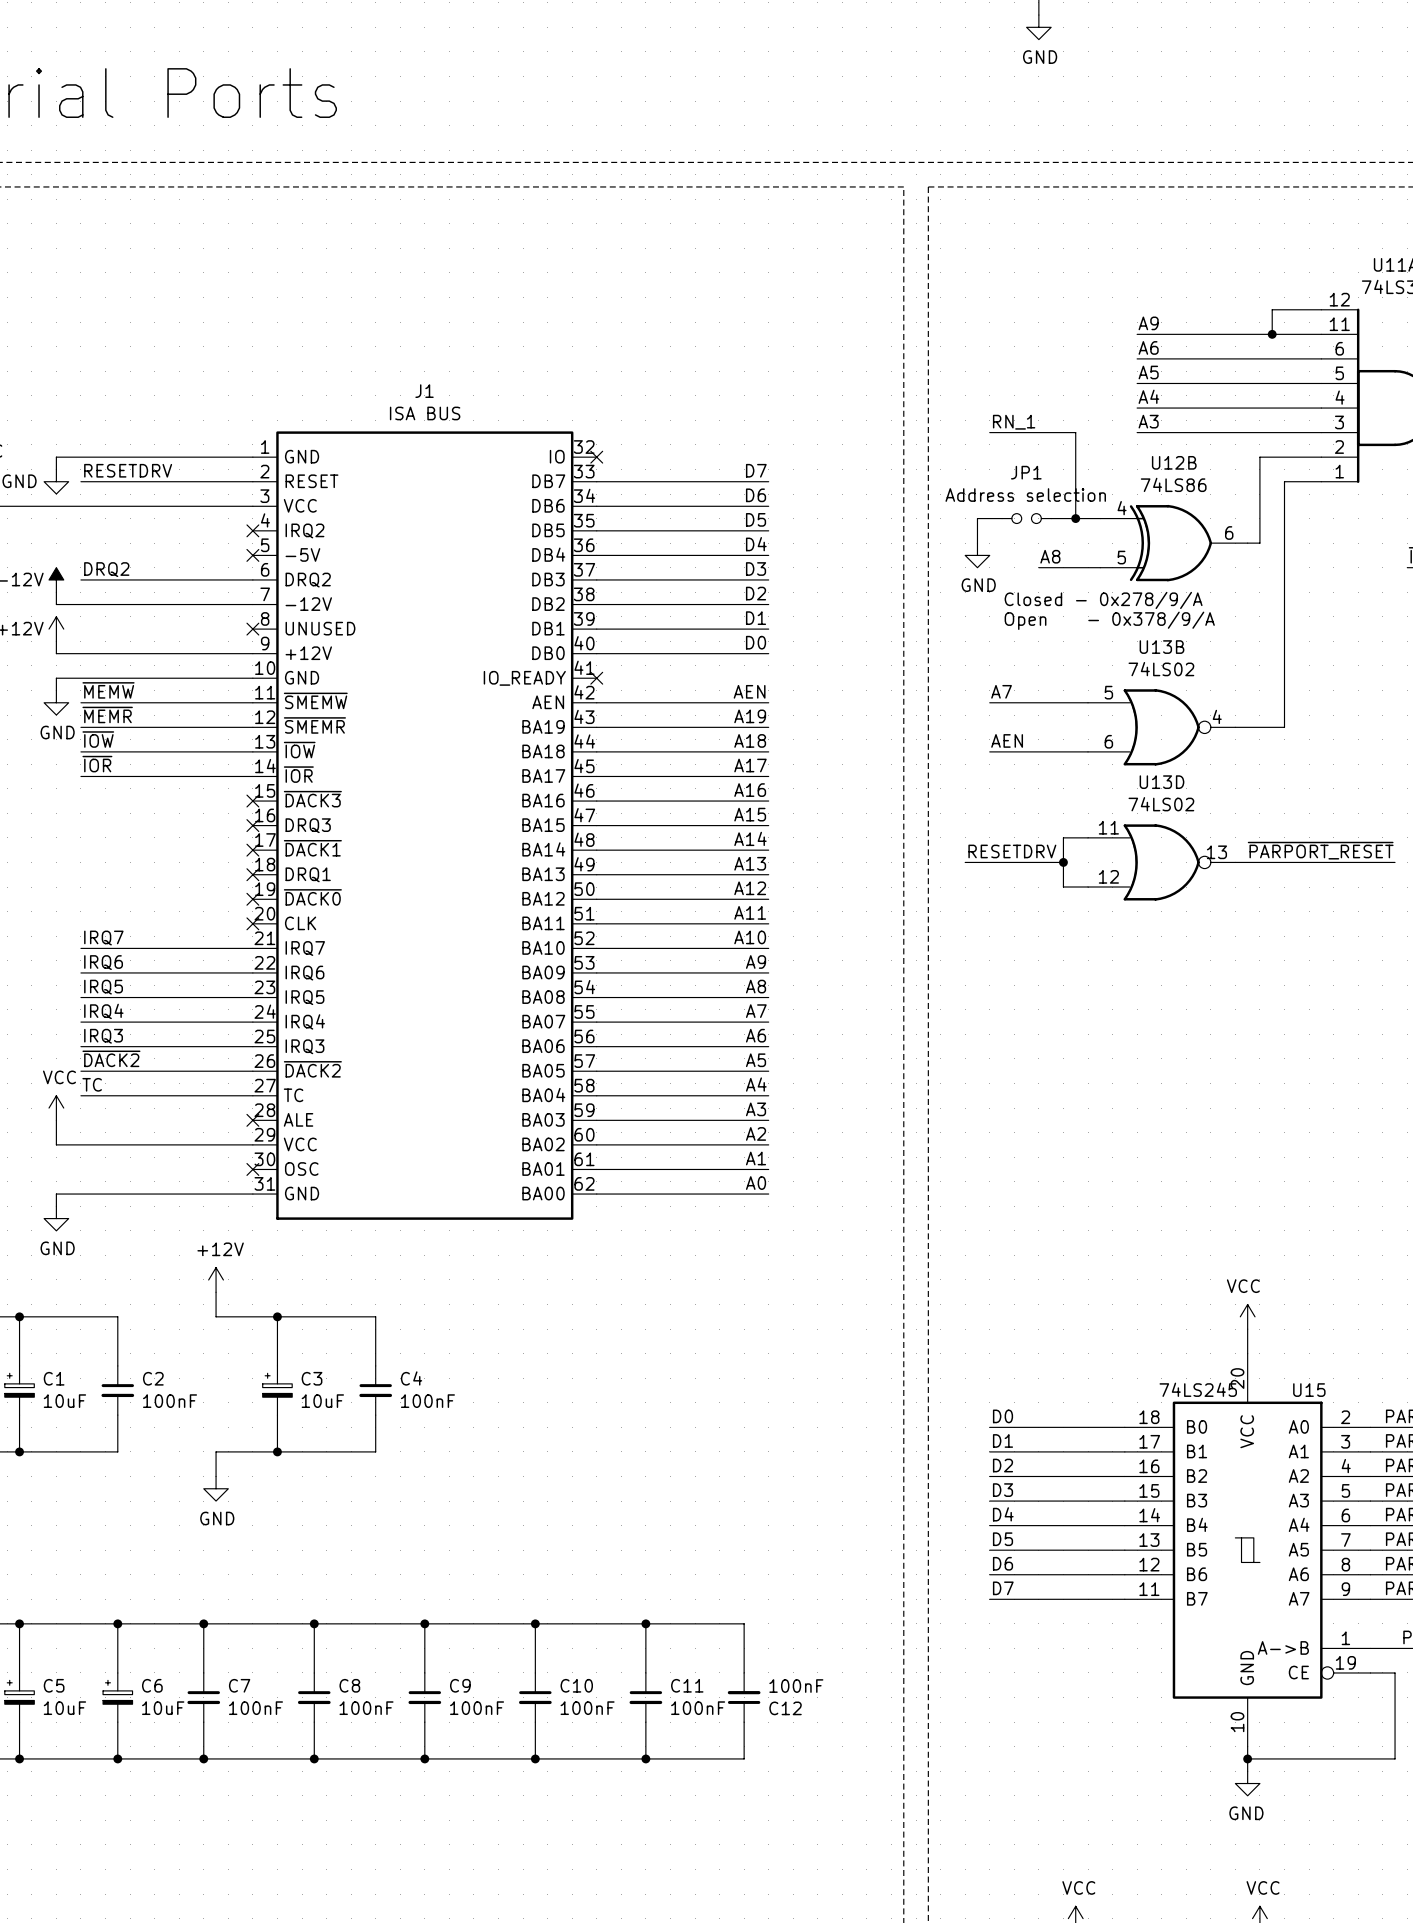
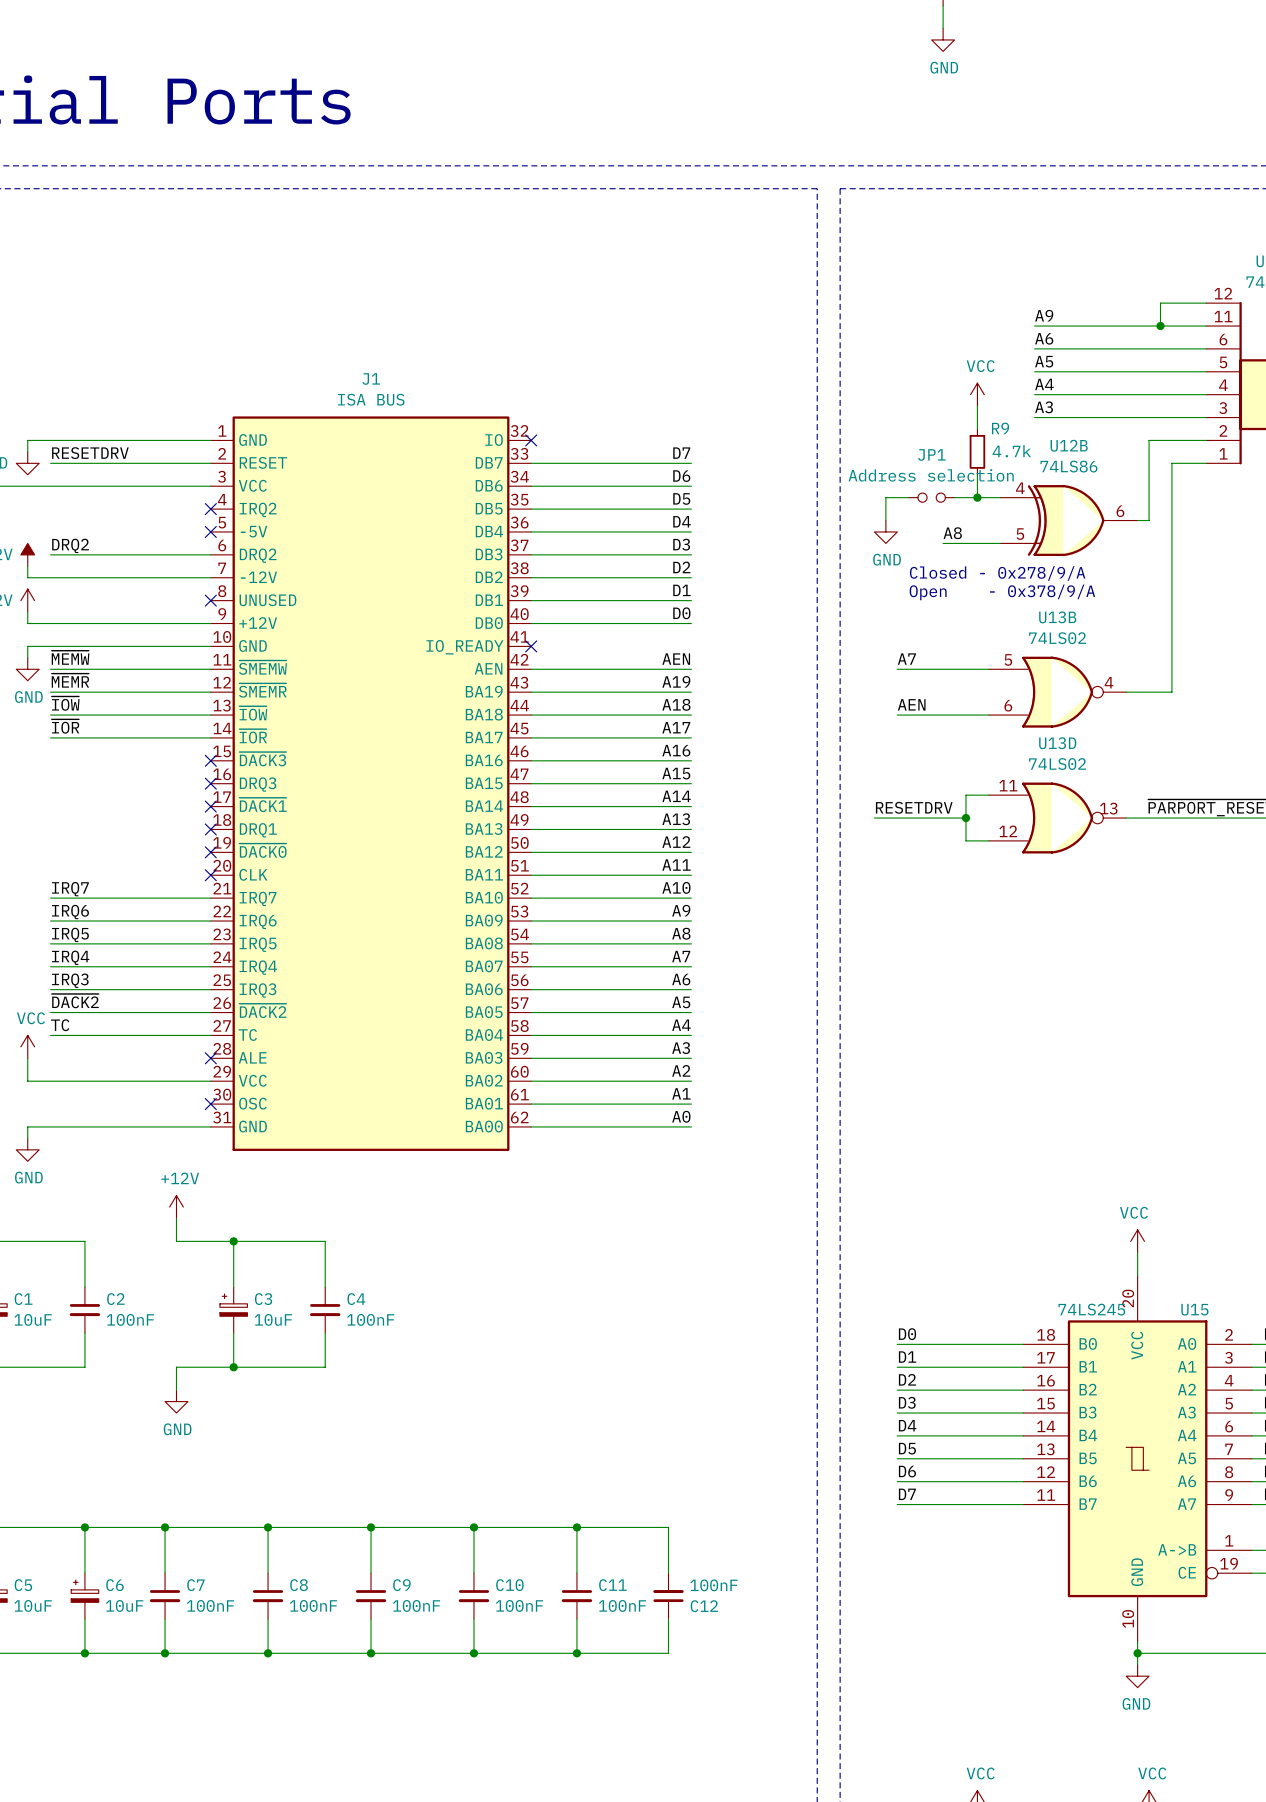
power symbol: none -> VCC (977, 394)
label: RN_1 (1014, 422) -> none
wire: (989, 432) (1075, 432) -> (977, 406) (977, 417)
wire: (1075, 444) (1075, 494) -> none
R9: none -> 4.7k (977, 451)

